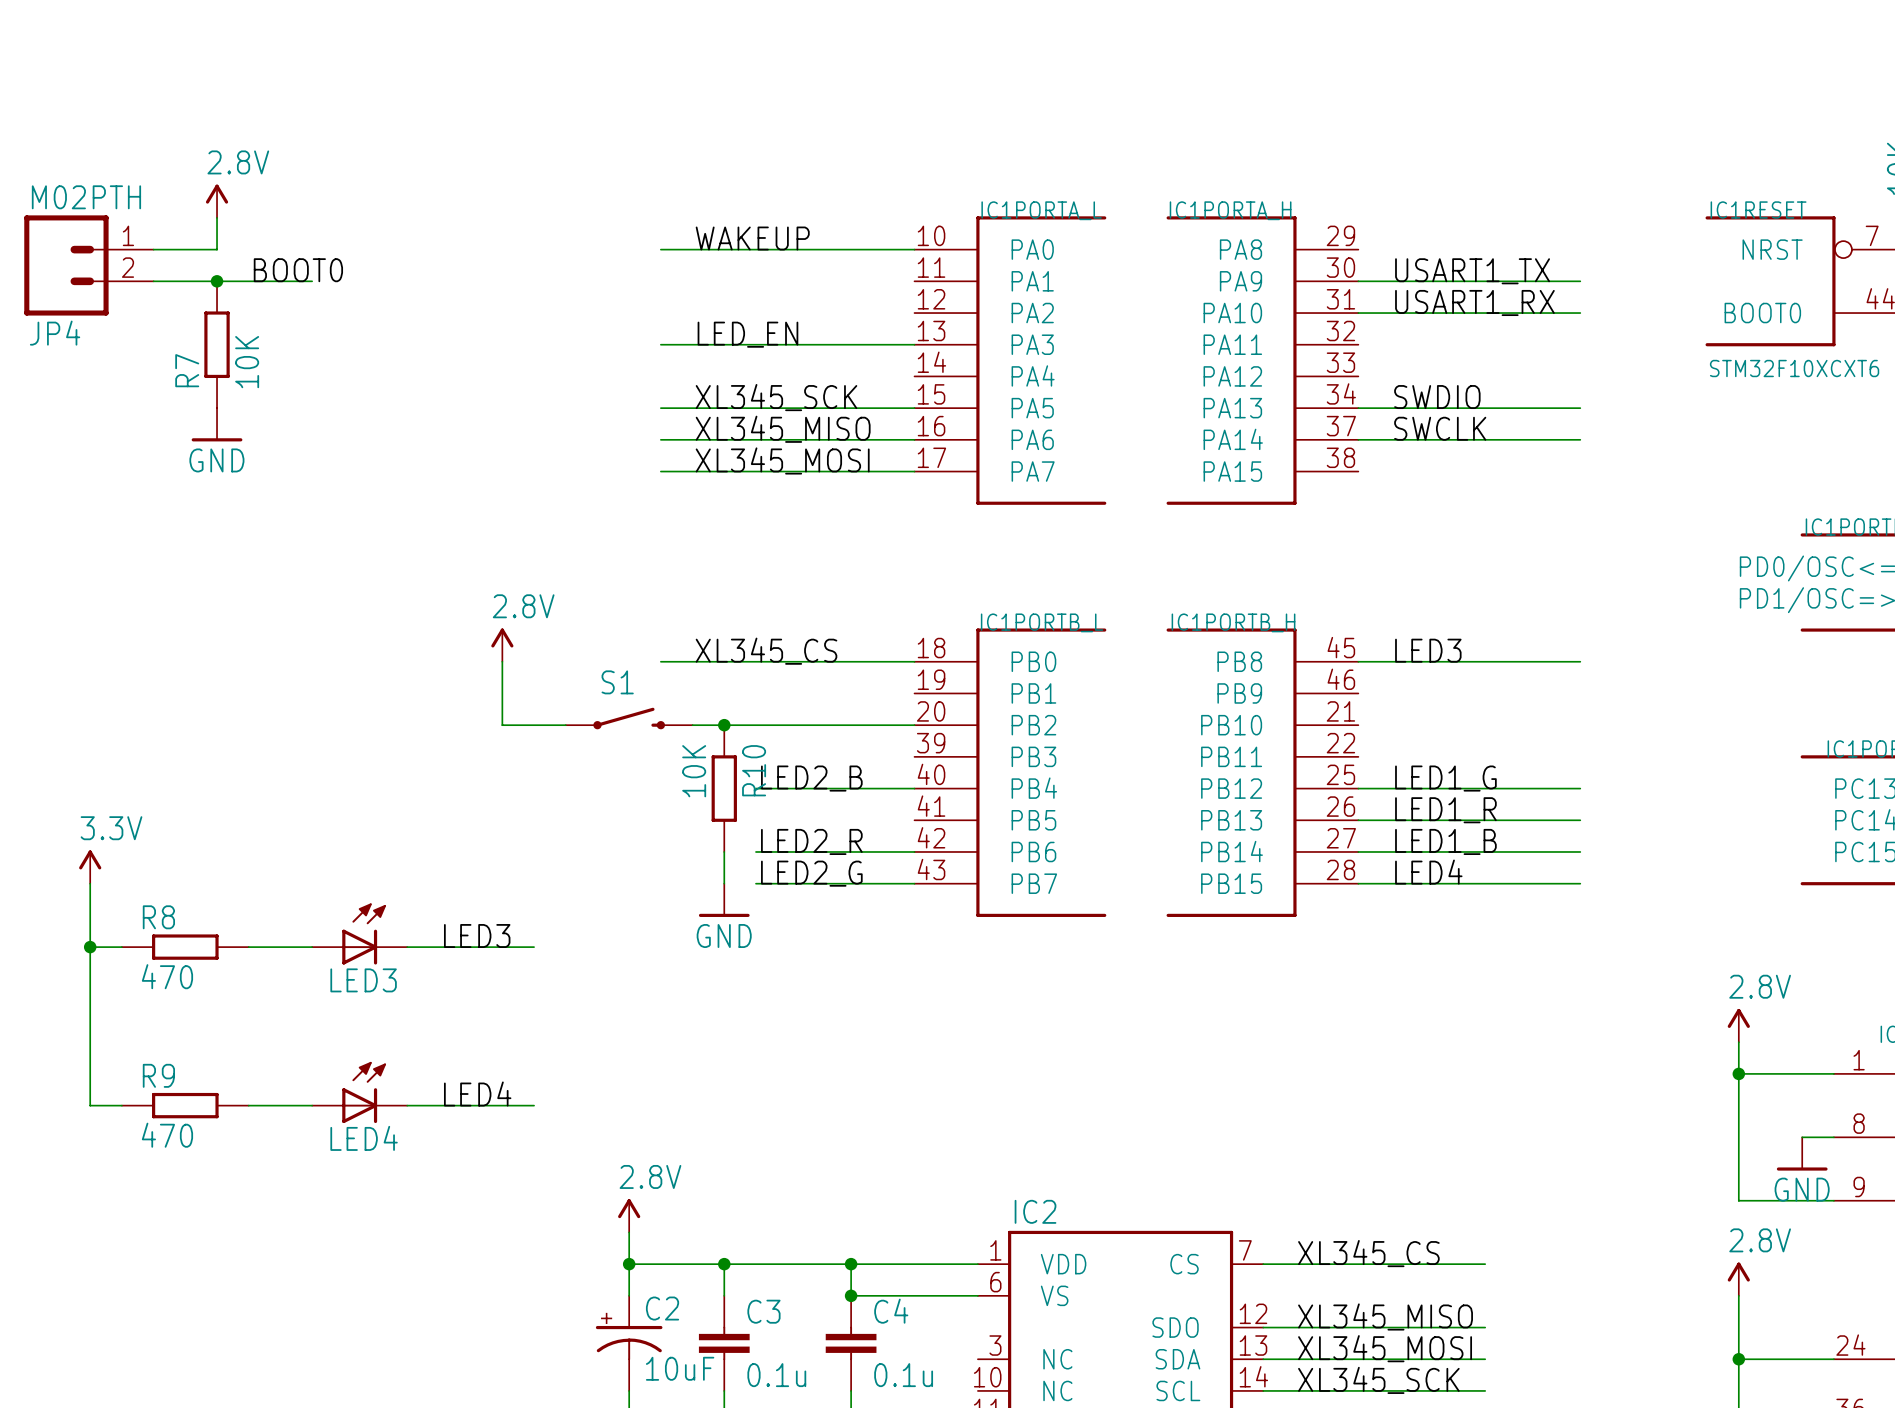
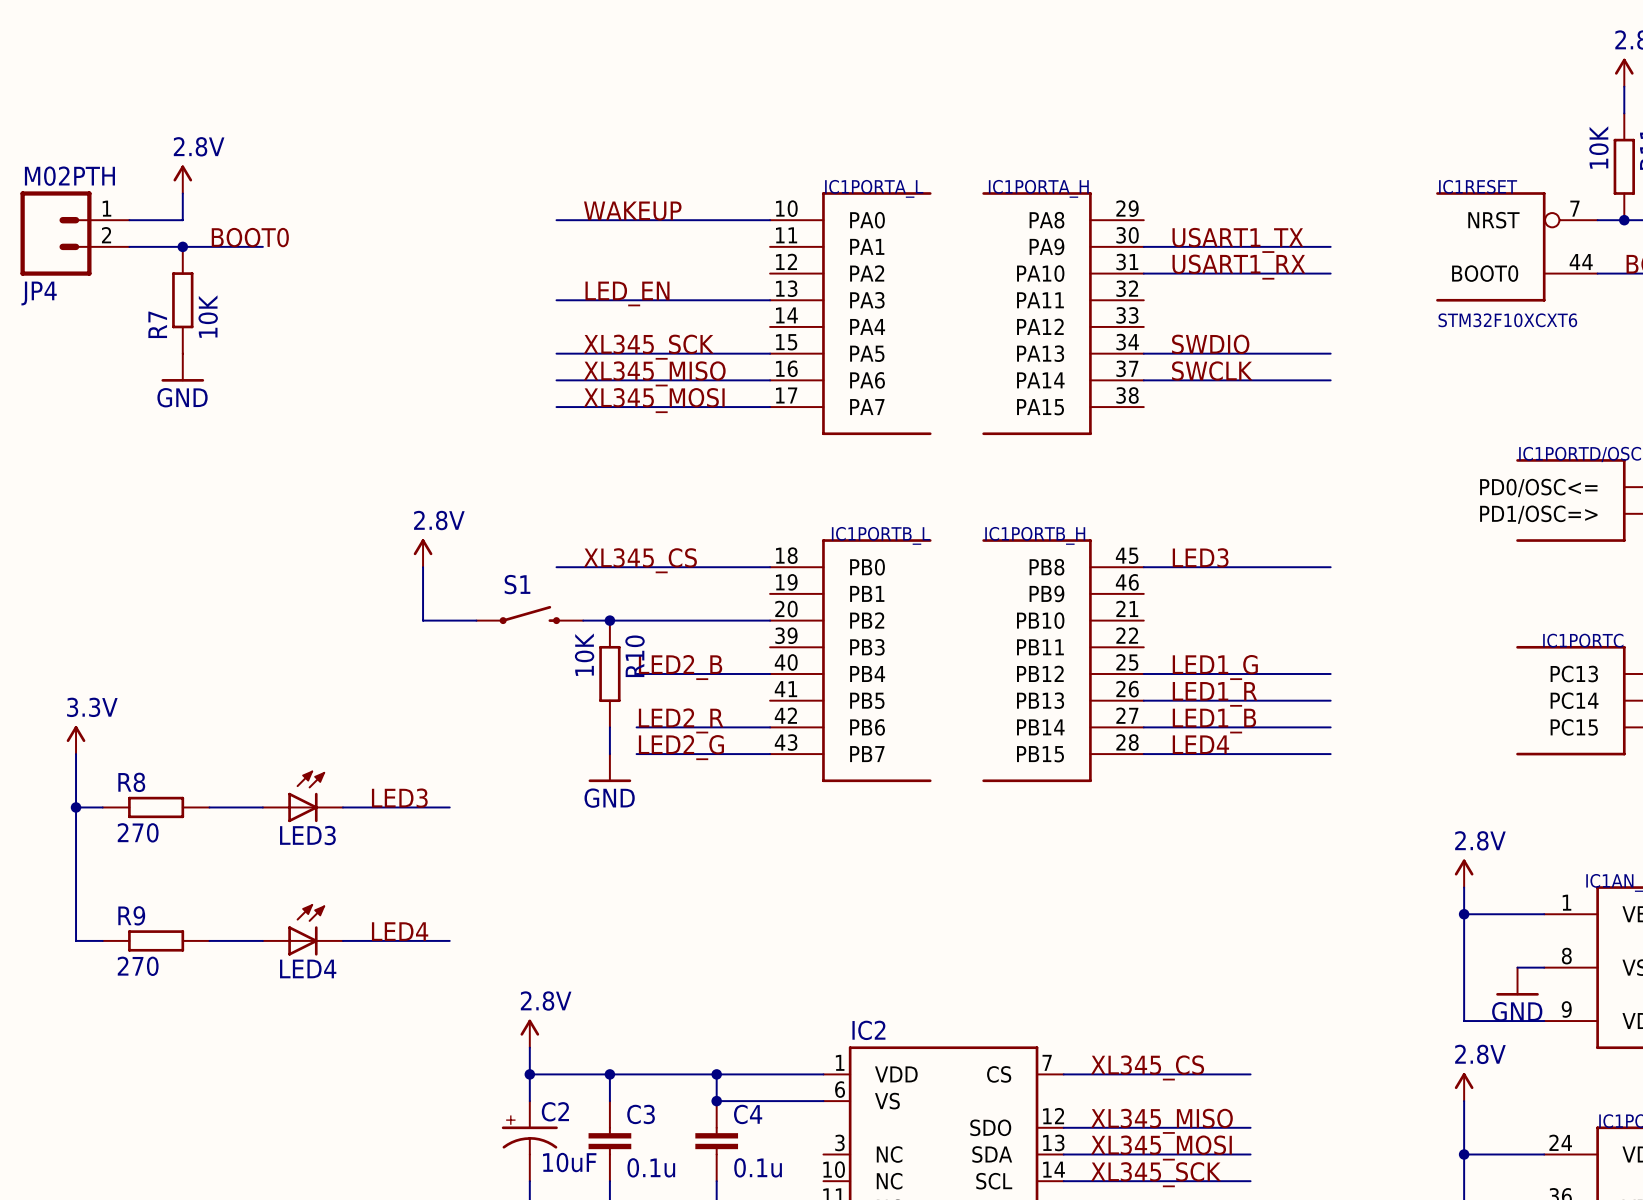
R8 value: 470 (167, 976) -> 270 (138, 832)
R9 value: 470 (167, 1135) -> 270 (138, 966)

